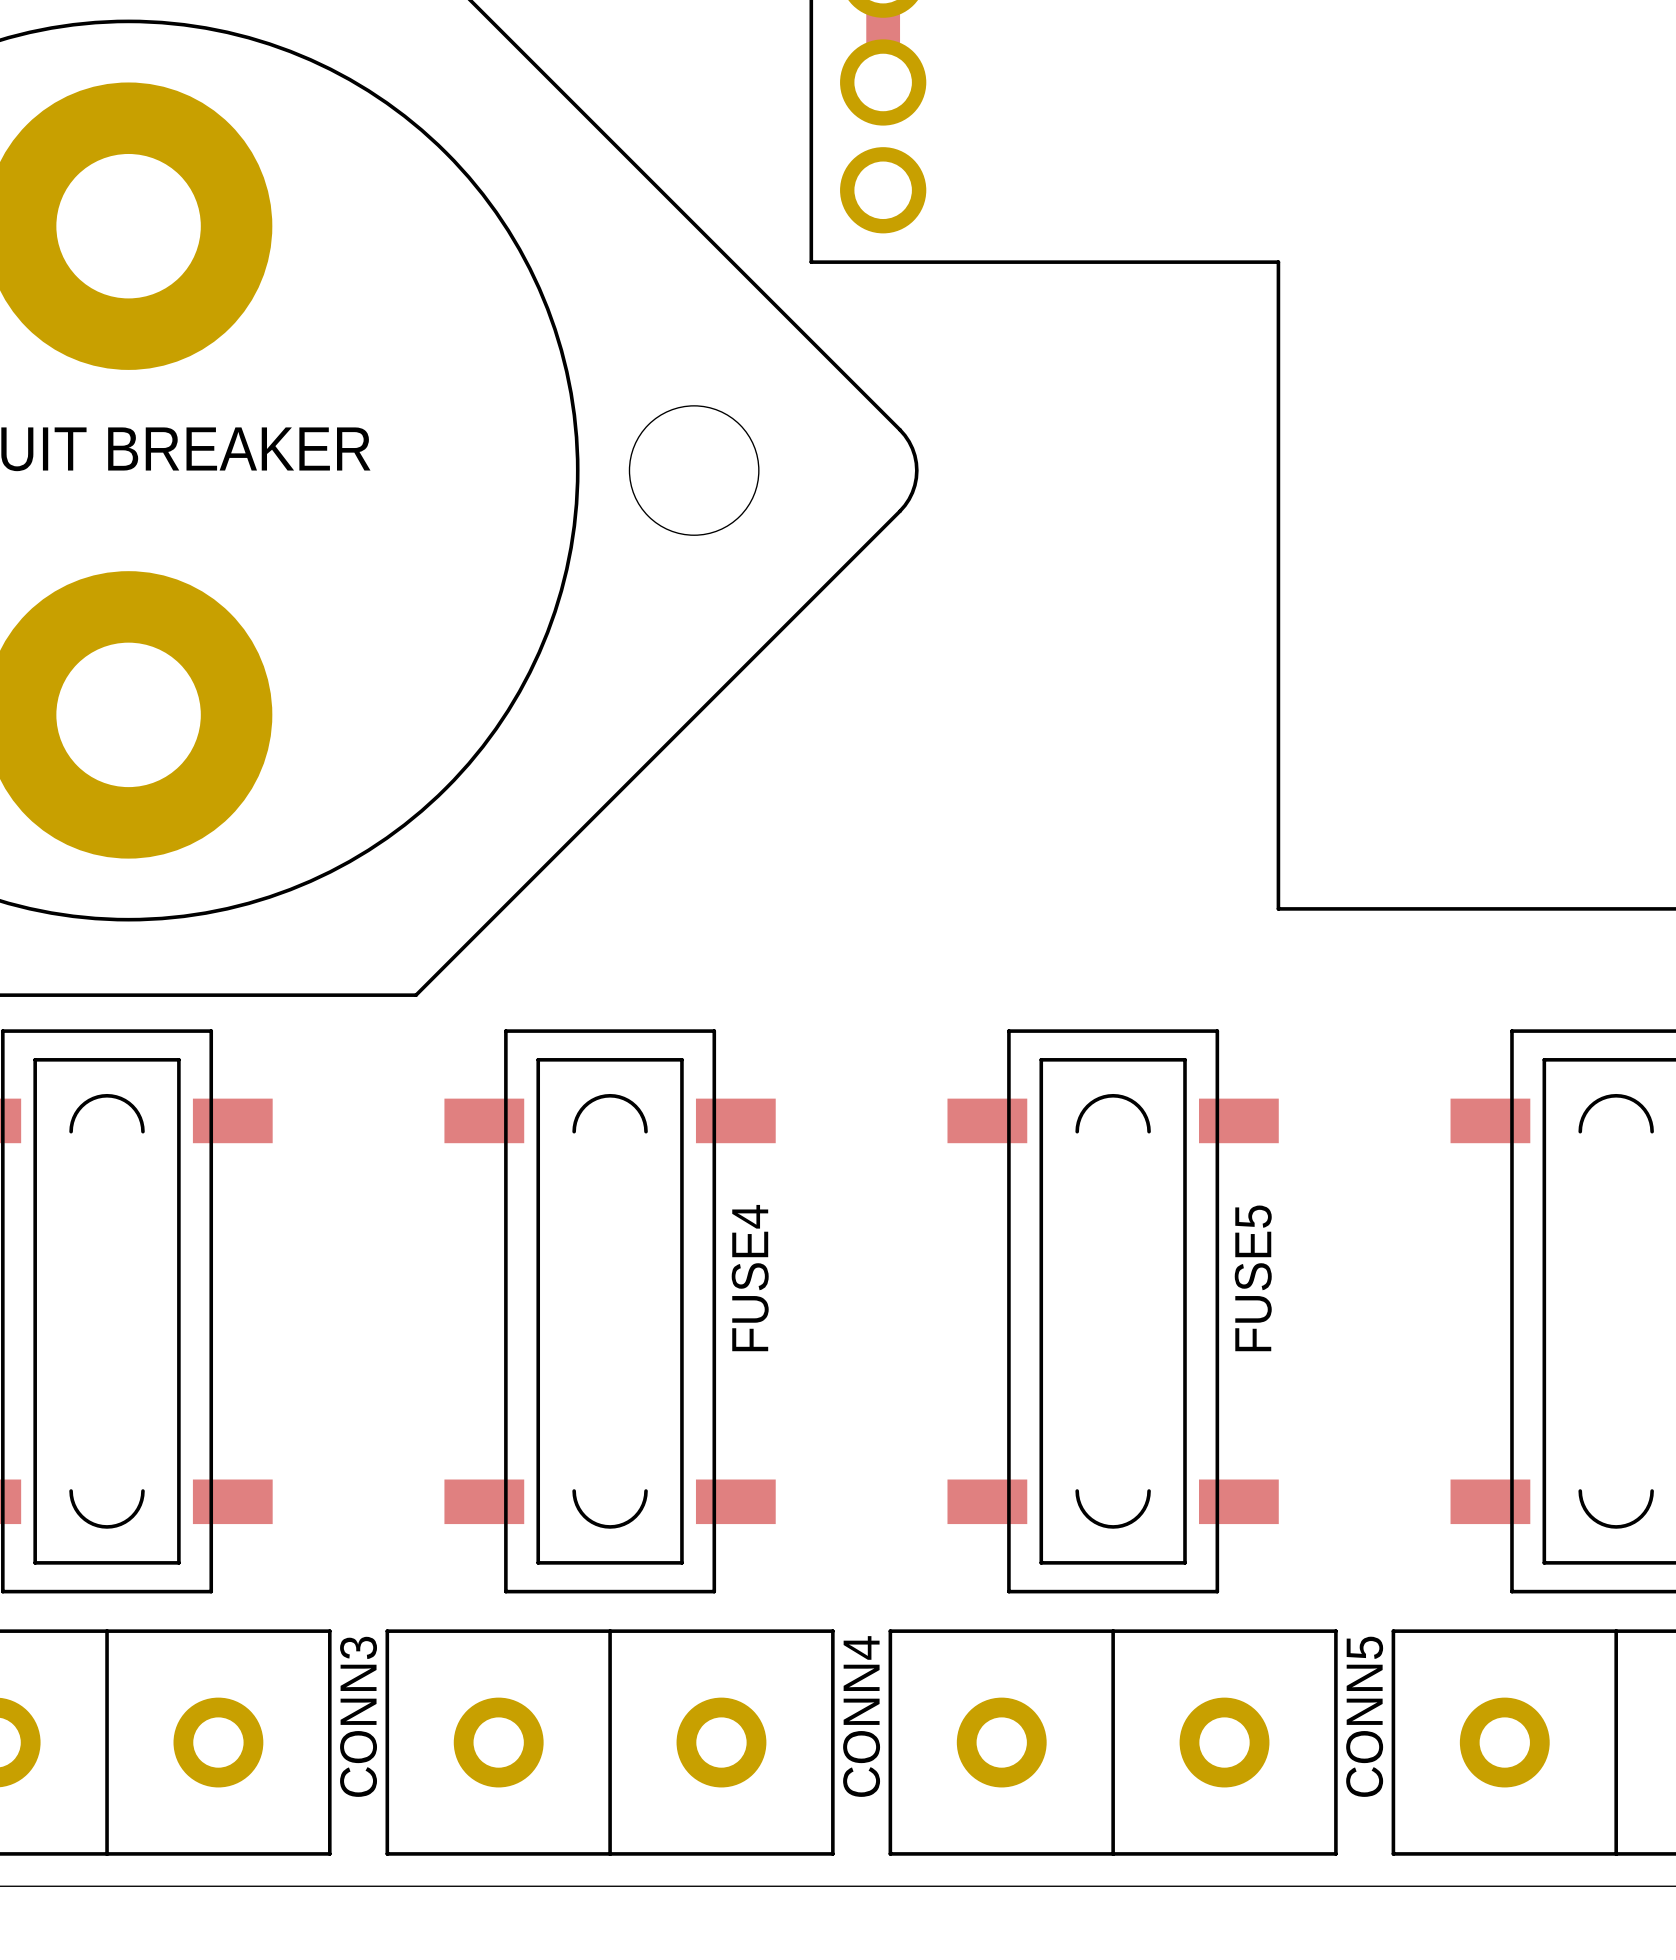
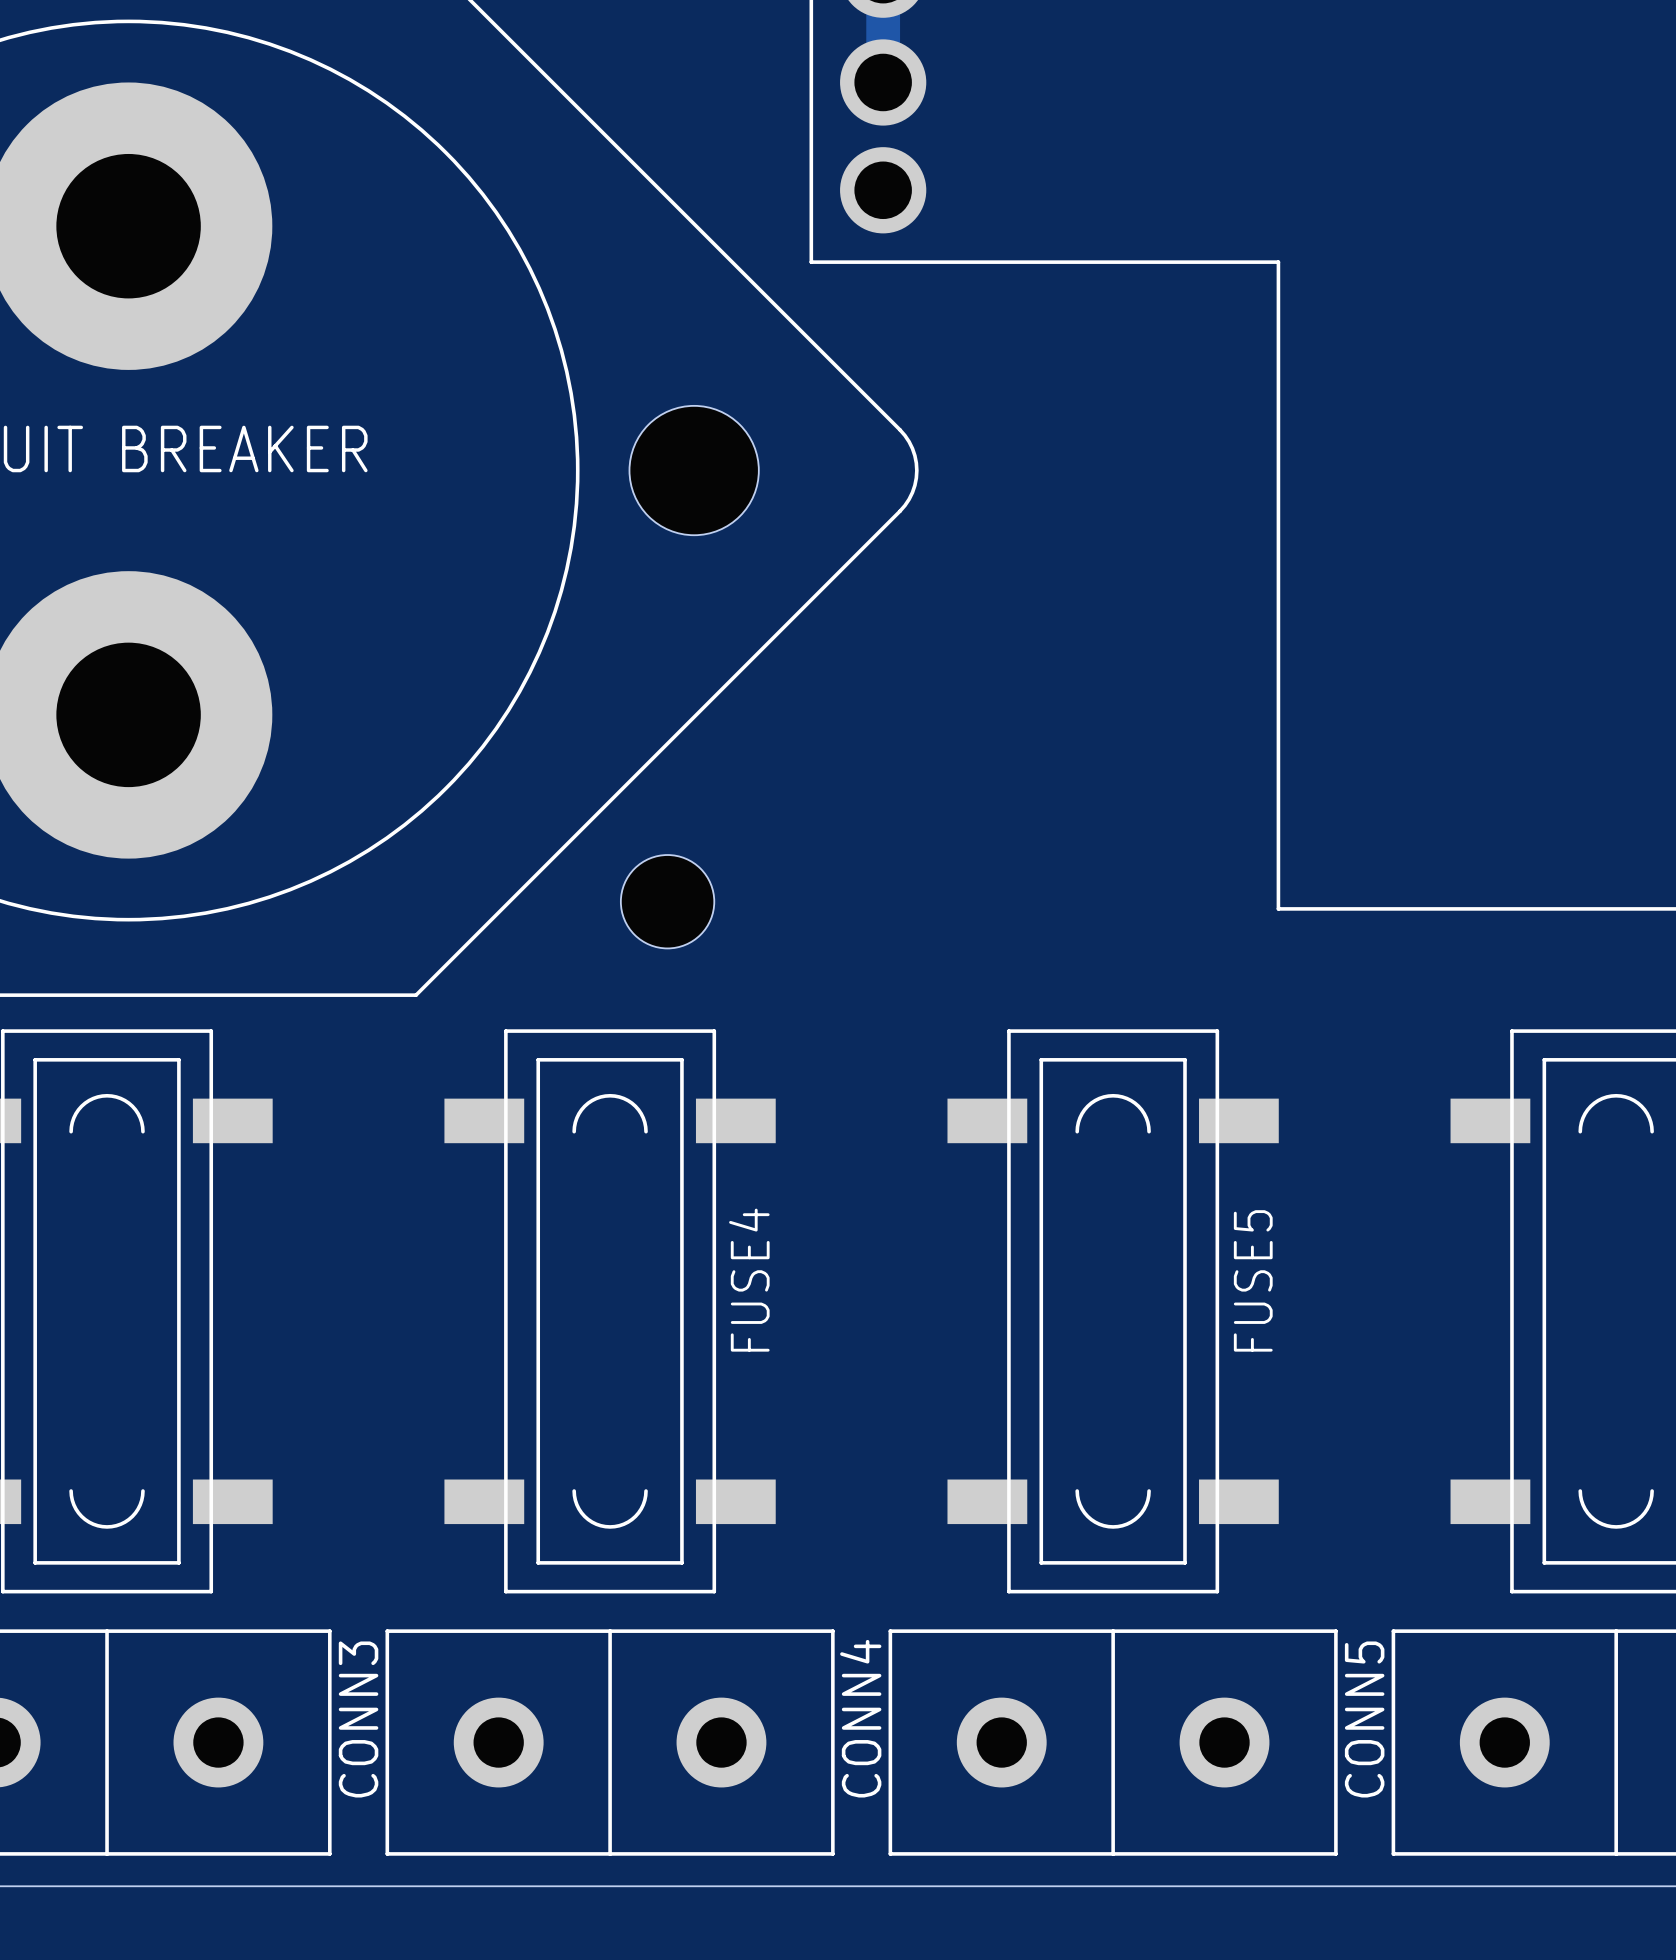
part: none -> (667, 901)

